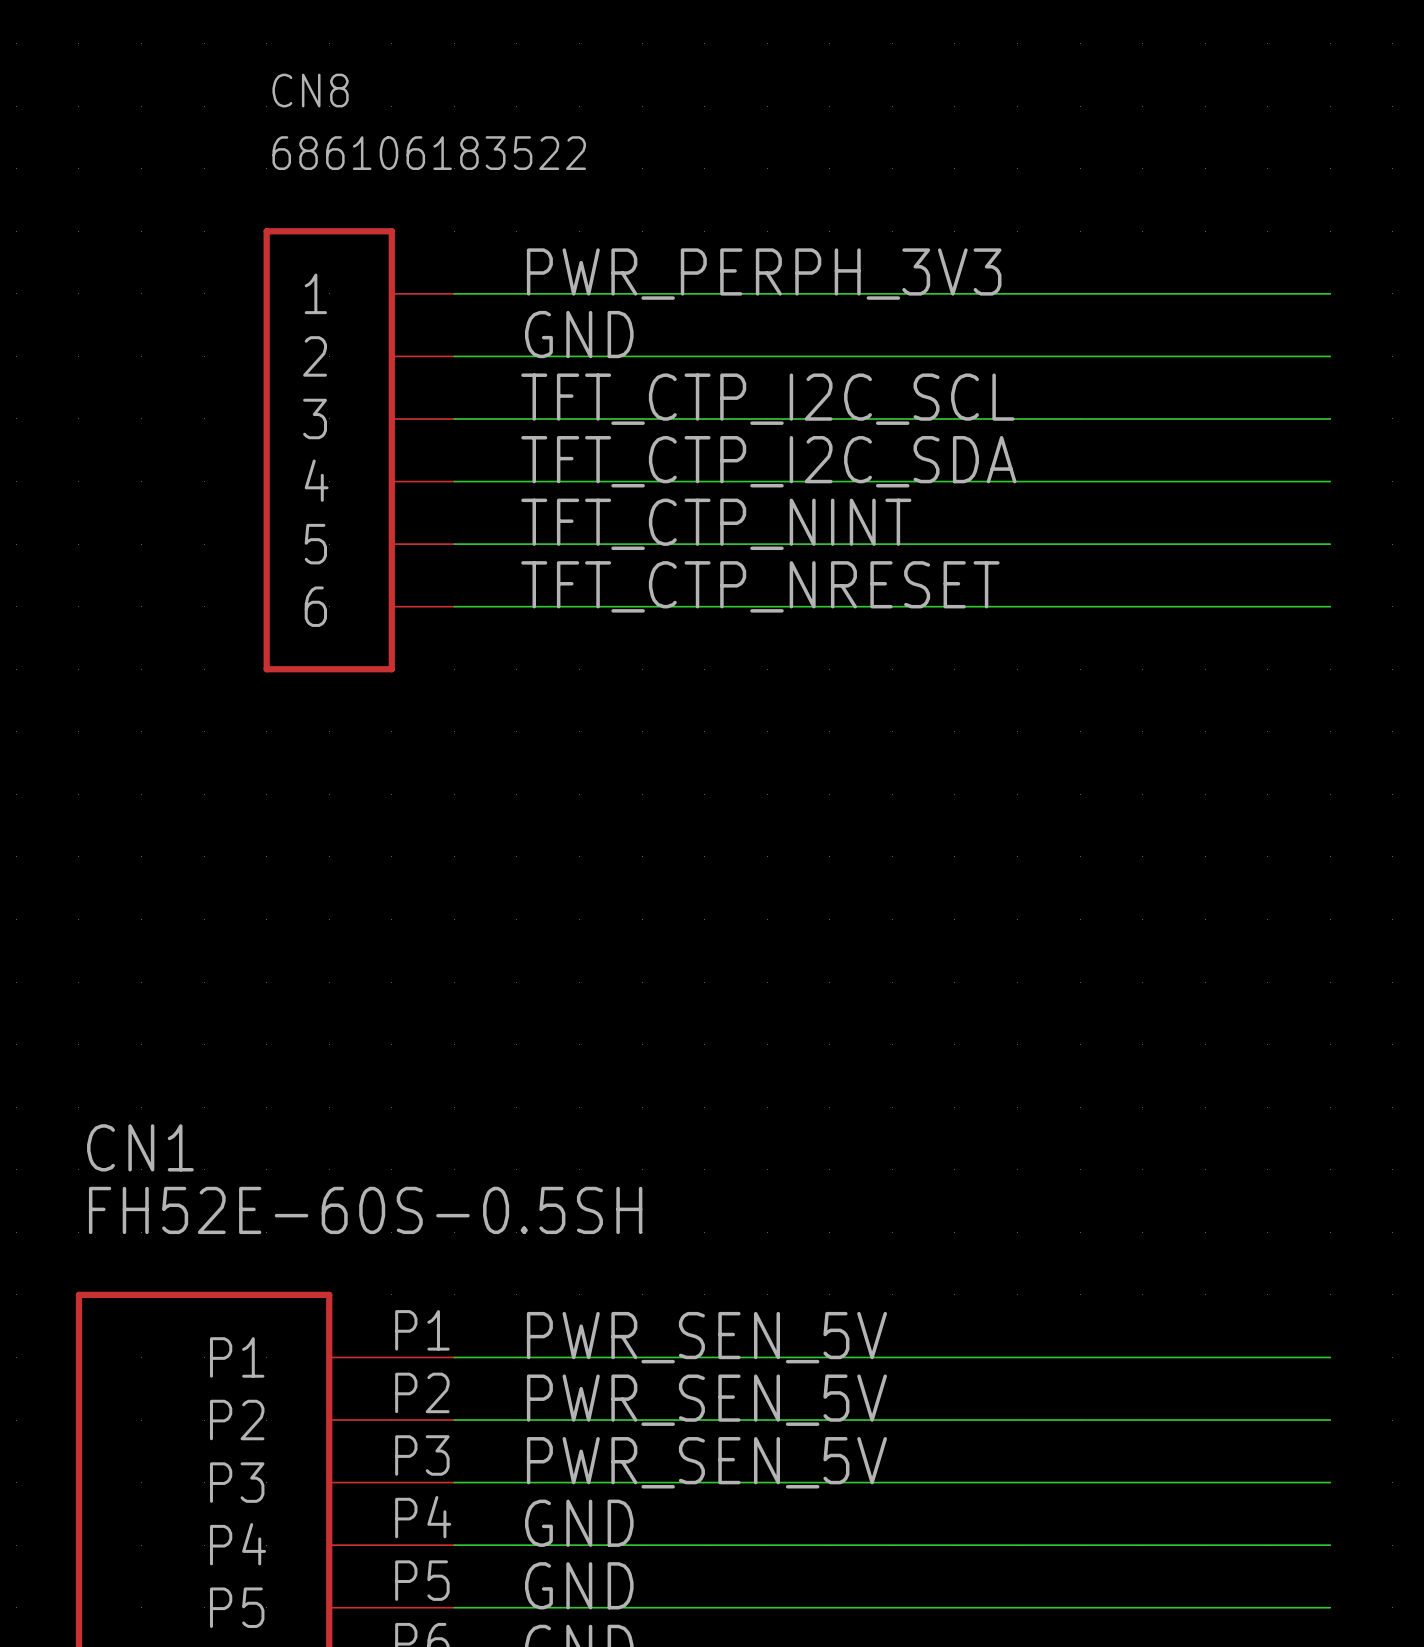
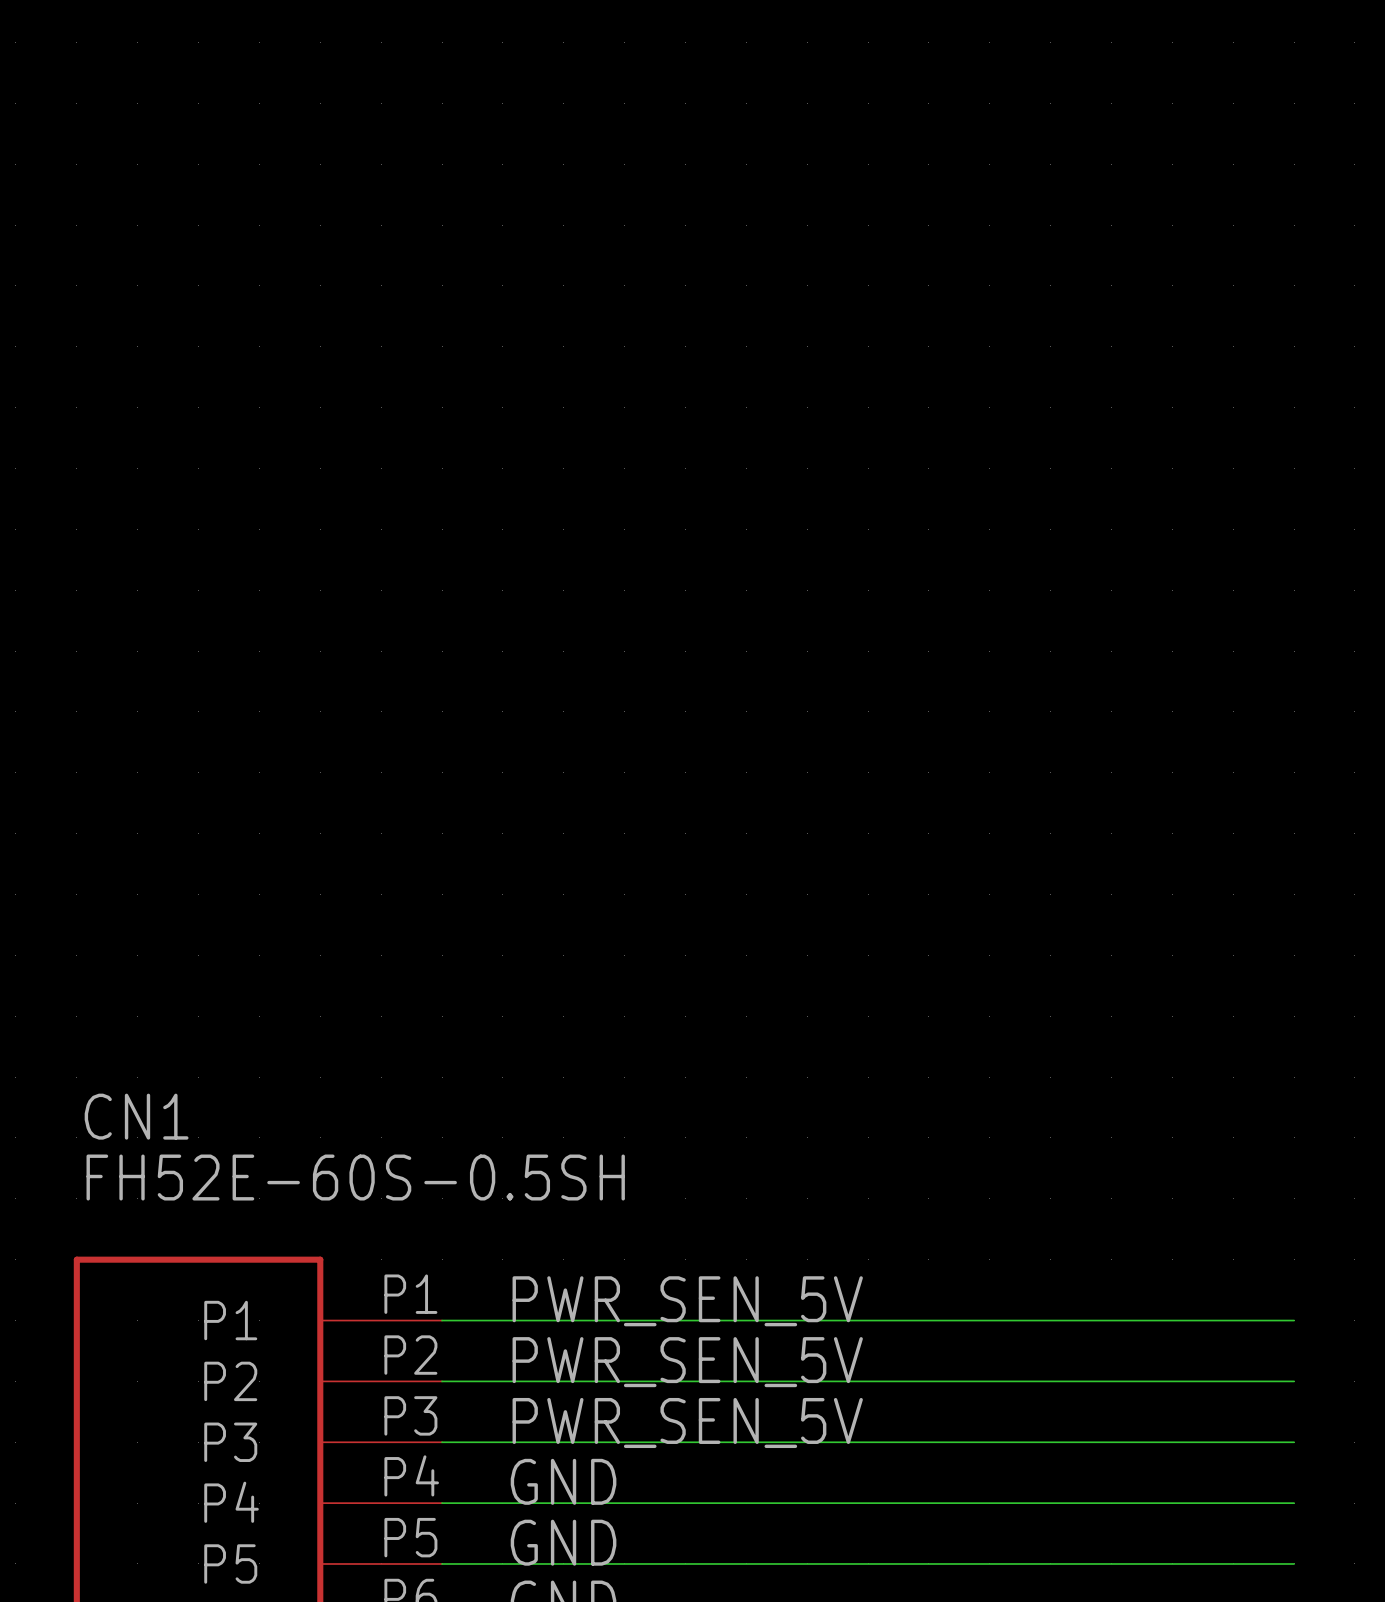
label: PWR_PERPH_3V3 (764, 274) -> none
wire: (454, 293) (1330, 293) -> none
label: GND (579, 334) -> none
wire: (454, 356) (1330, 356) -> none
label: TFT_CTP_I2C_SCL (767, 399) -> none
wire: (454, 418) (1330, 418) -> none
CN8: 686106183522 (358, 450) -> none
label: TFT_CTP_I2C_SDA (768, 461) -> none
wire: (454, 481) (1330, 481) -> none
label: TFT_CTP_NINT (716, 524) -> none
wire: (454, 544) (1330, 544) -> none
label: TFT_CTP_NRESET (760, 586) -> none
wire: (454, 606) (1330, 606) -> none

